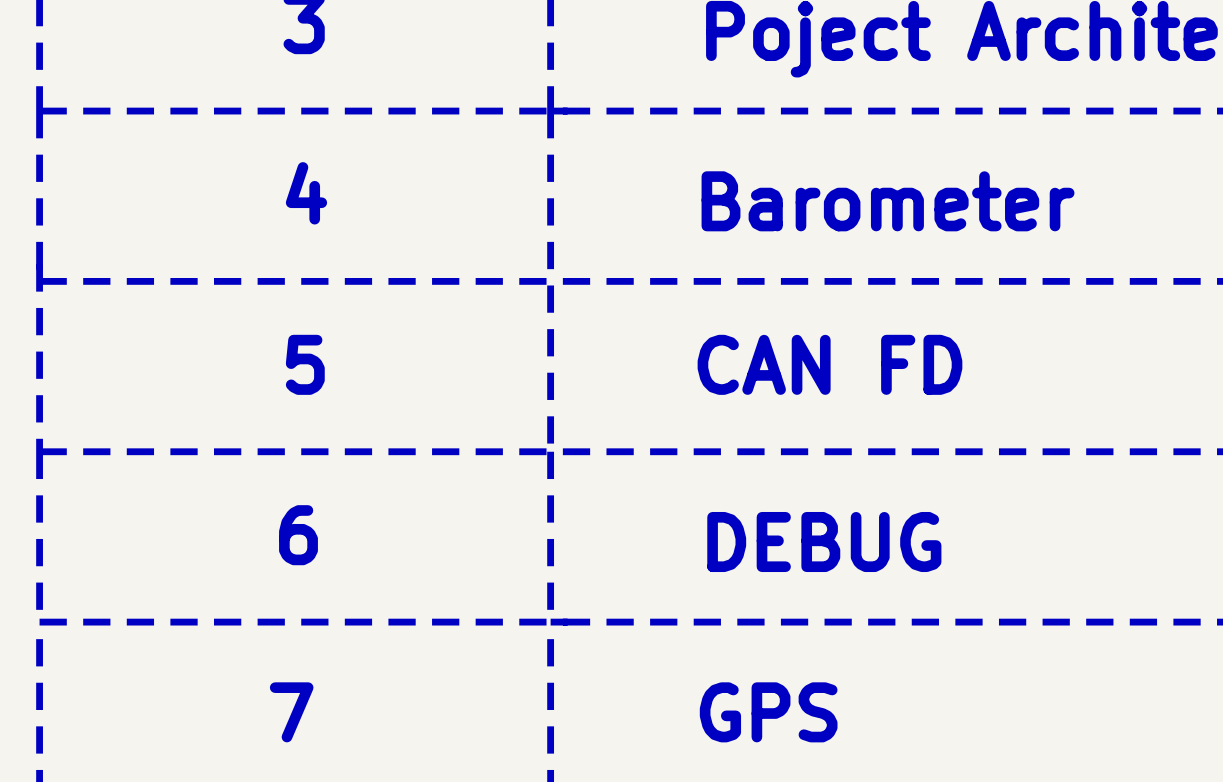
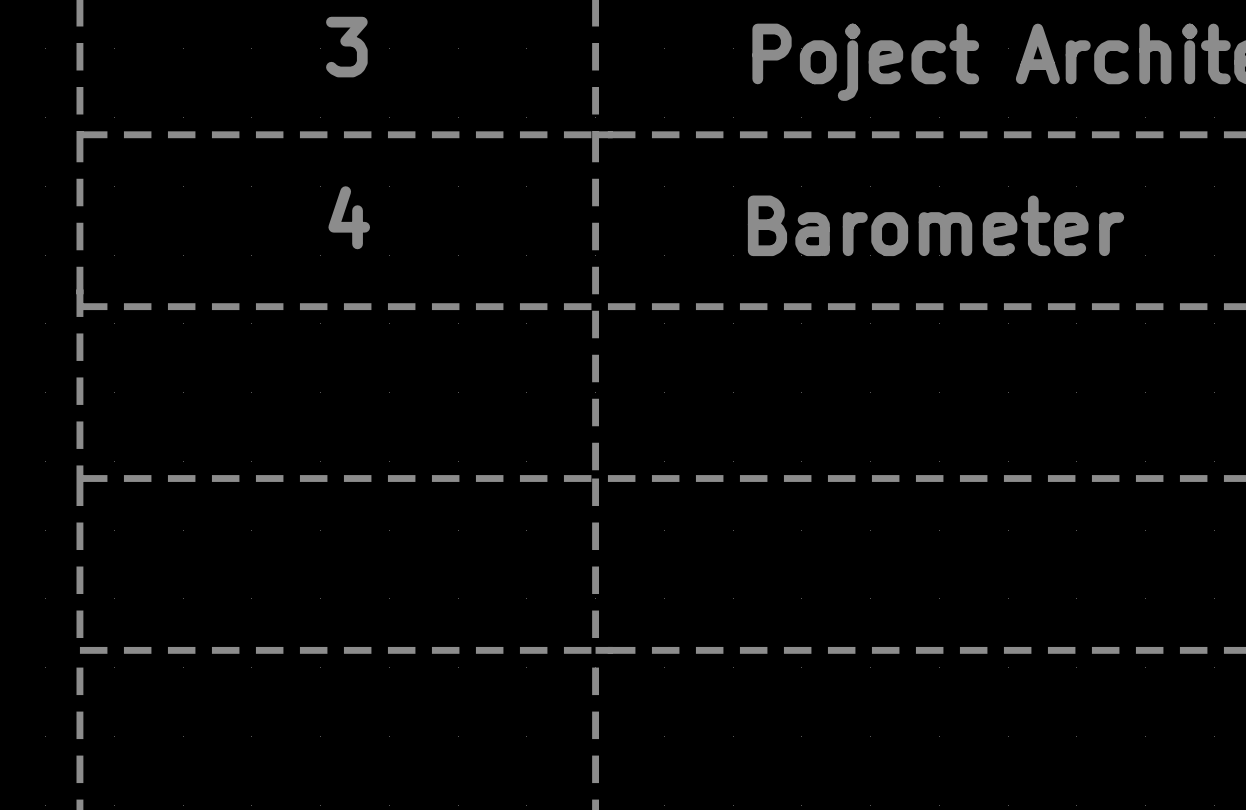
text: 5 (305, 364) -> none
text: CAN FD (829, 364) -> none
text: 6 (298, 535) -> none
text: DEBUG (824, 542) -> none
text: 7 (291, 712) -> none
text: GPS (768, 712) -> none

